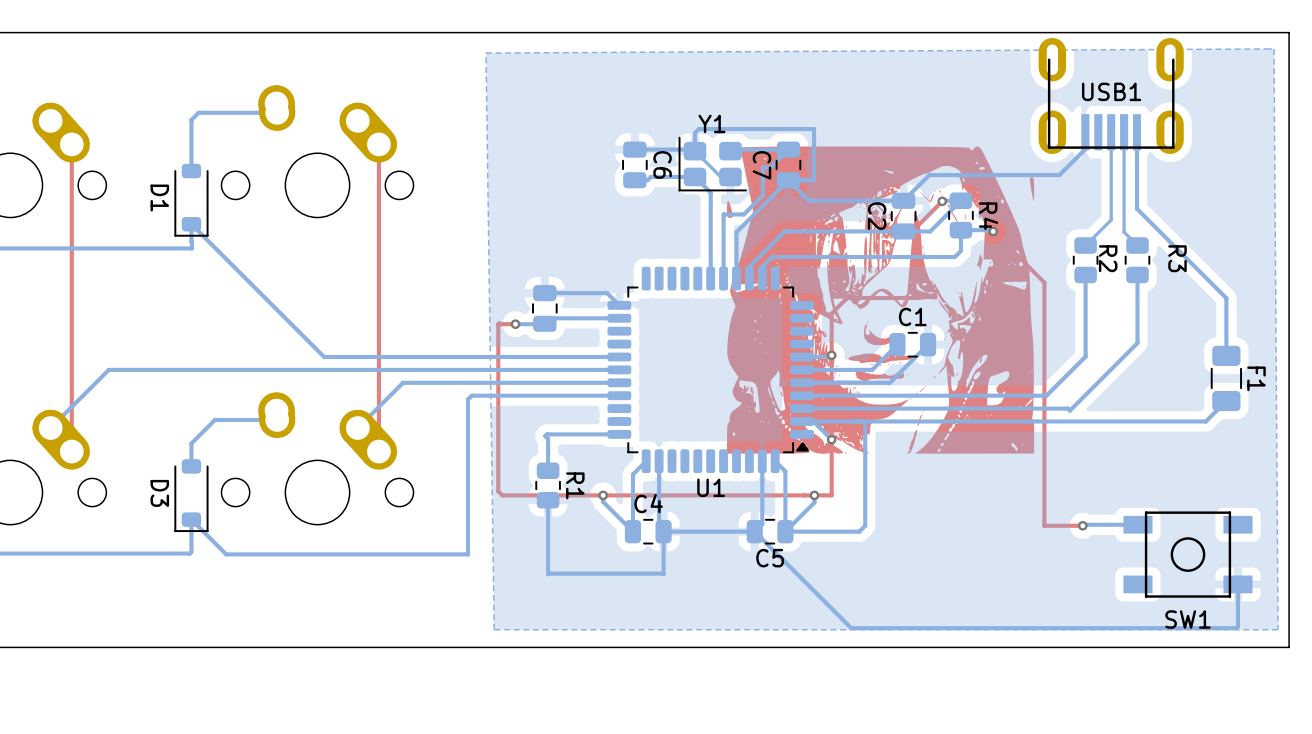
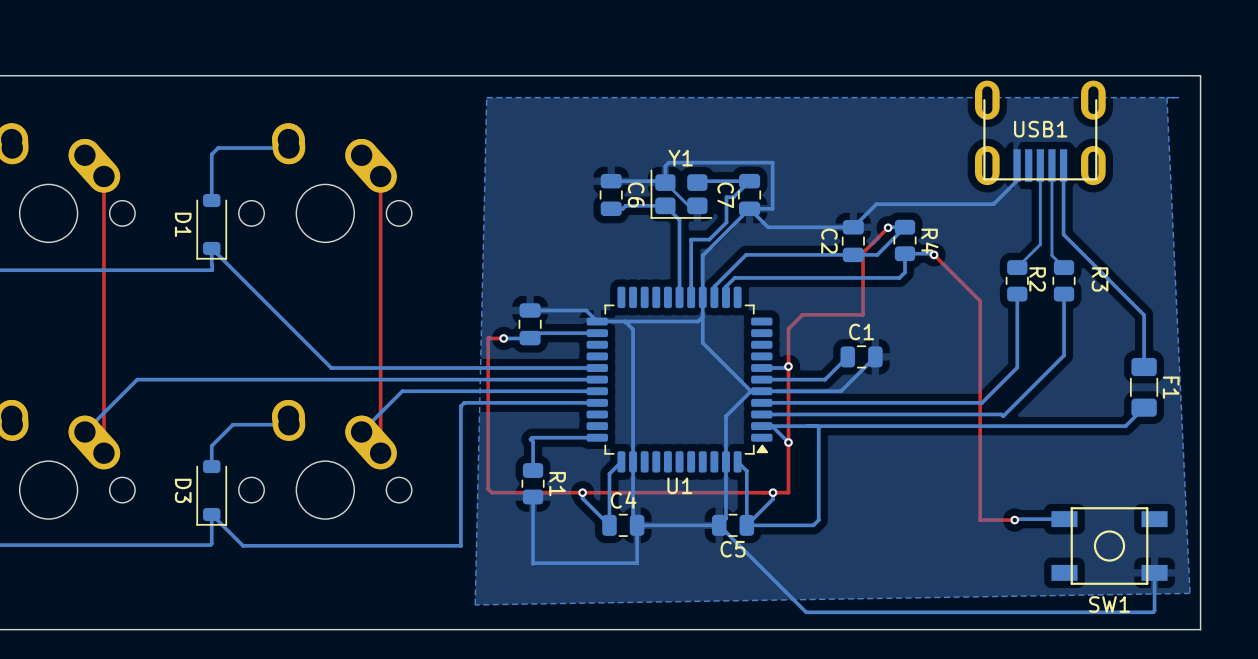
bottom zone outline: (1273, 48) (1278, 629) (494, 629) (486, 53) (1273, 48) -> none
bottom zone outline: none -> (1178, 97) (486, 97) (475, 604) (1189, 593) (1166, 97)
drawing: [727, 146, 1035, 454] -> none
bottom track: none -> (702, 297) (702, 342) (751, 391)
bottom track: none -> (702, 316) (697, 321) (597, 321)
bottom track: none -> (625, 321) (633, 329) (633, 461)
bottom track: none -> (751, 391) (726, 416) (726, 461)

